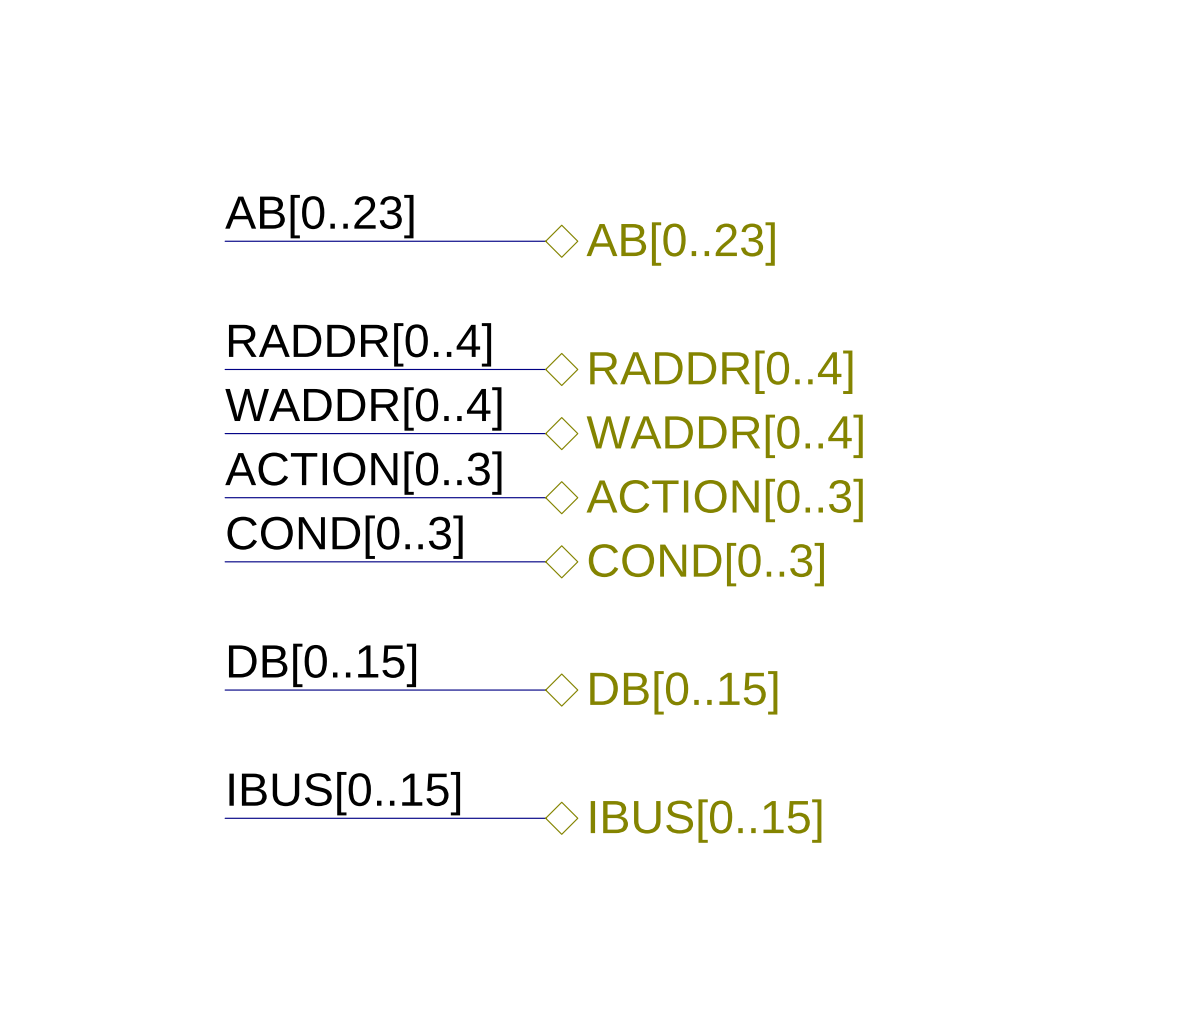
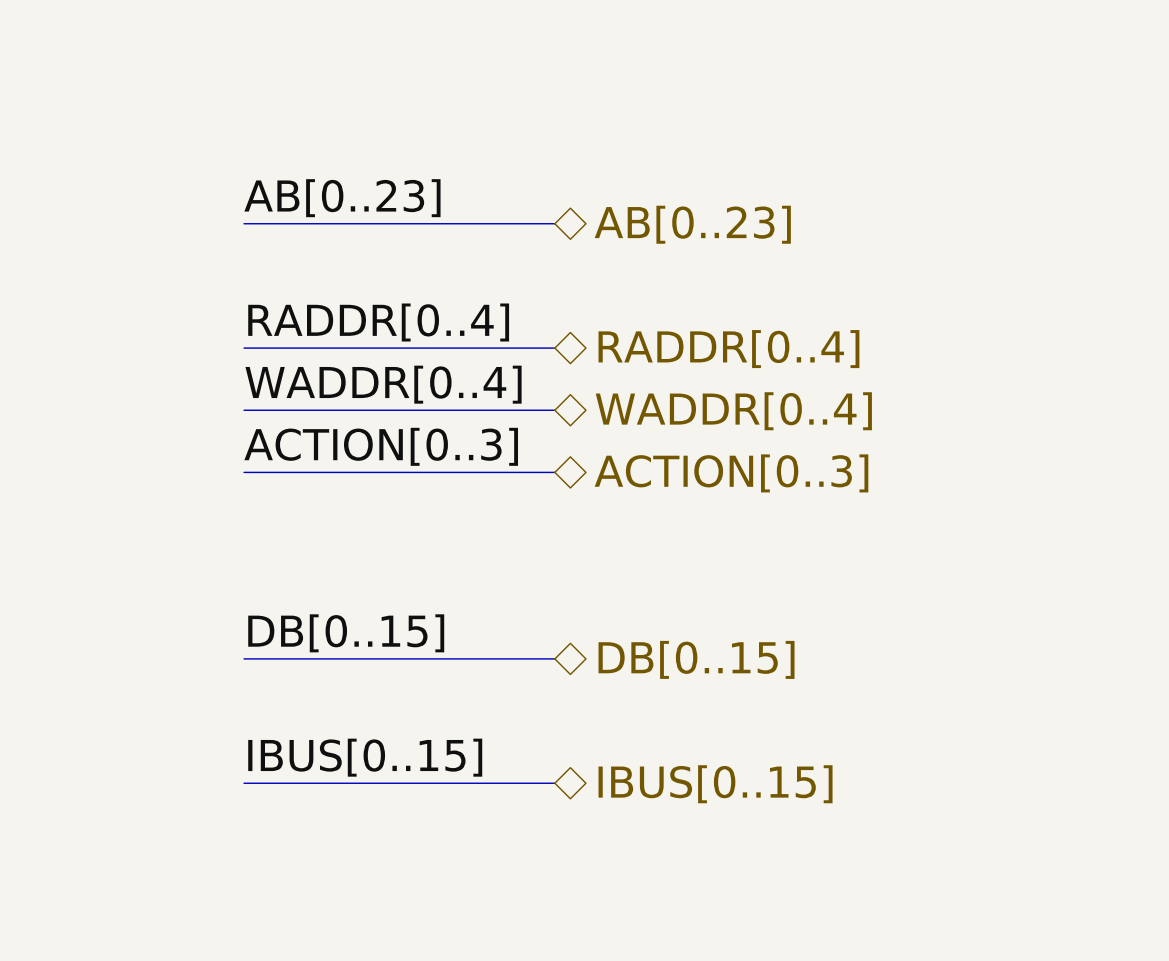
label: COND[0..3] (345, 537) -> none
bus: (225, 561) (545, 561) -> none
hierarchical label: COND[0..3] (706, 564) -> none

